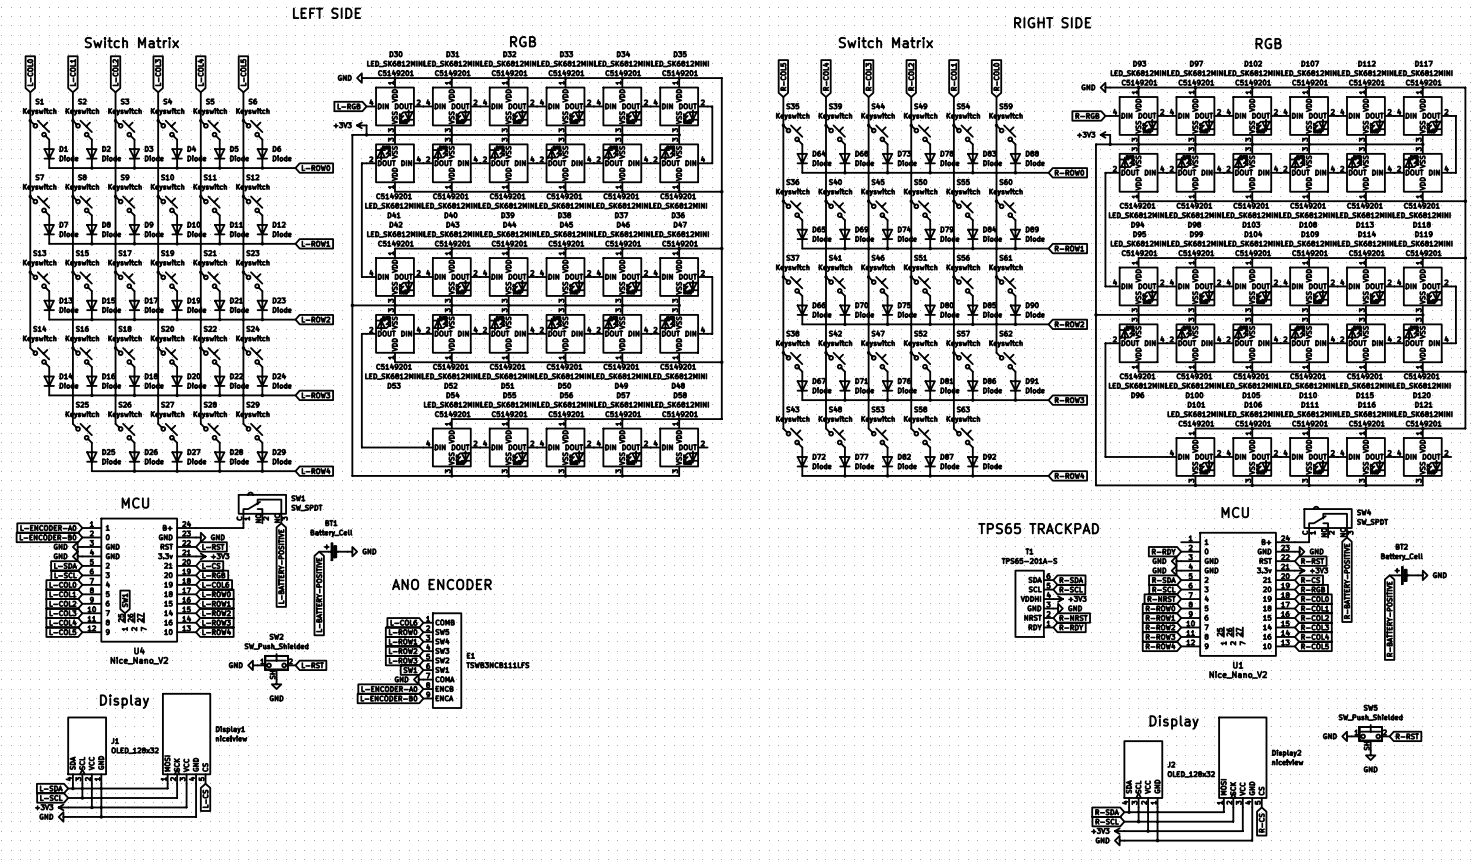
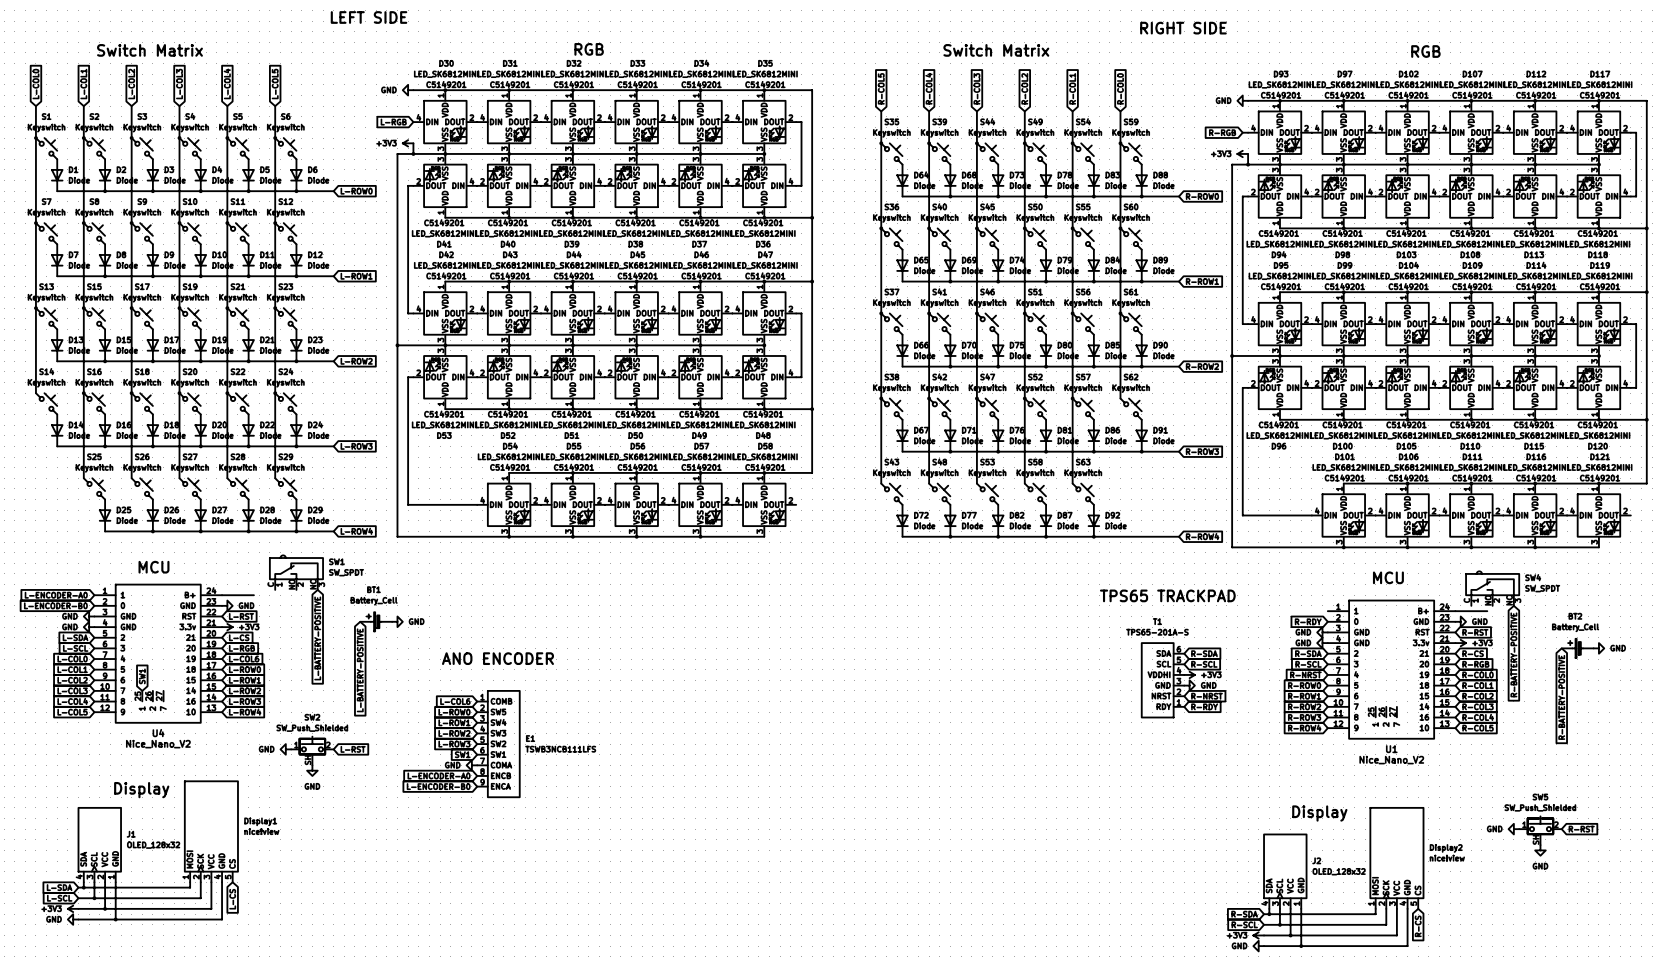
wire: (243, 523) (243, 528) (224, 528) -> none
wire: (1309, 537) (1309, 542) -> (1487, 611) (1471, 611)

